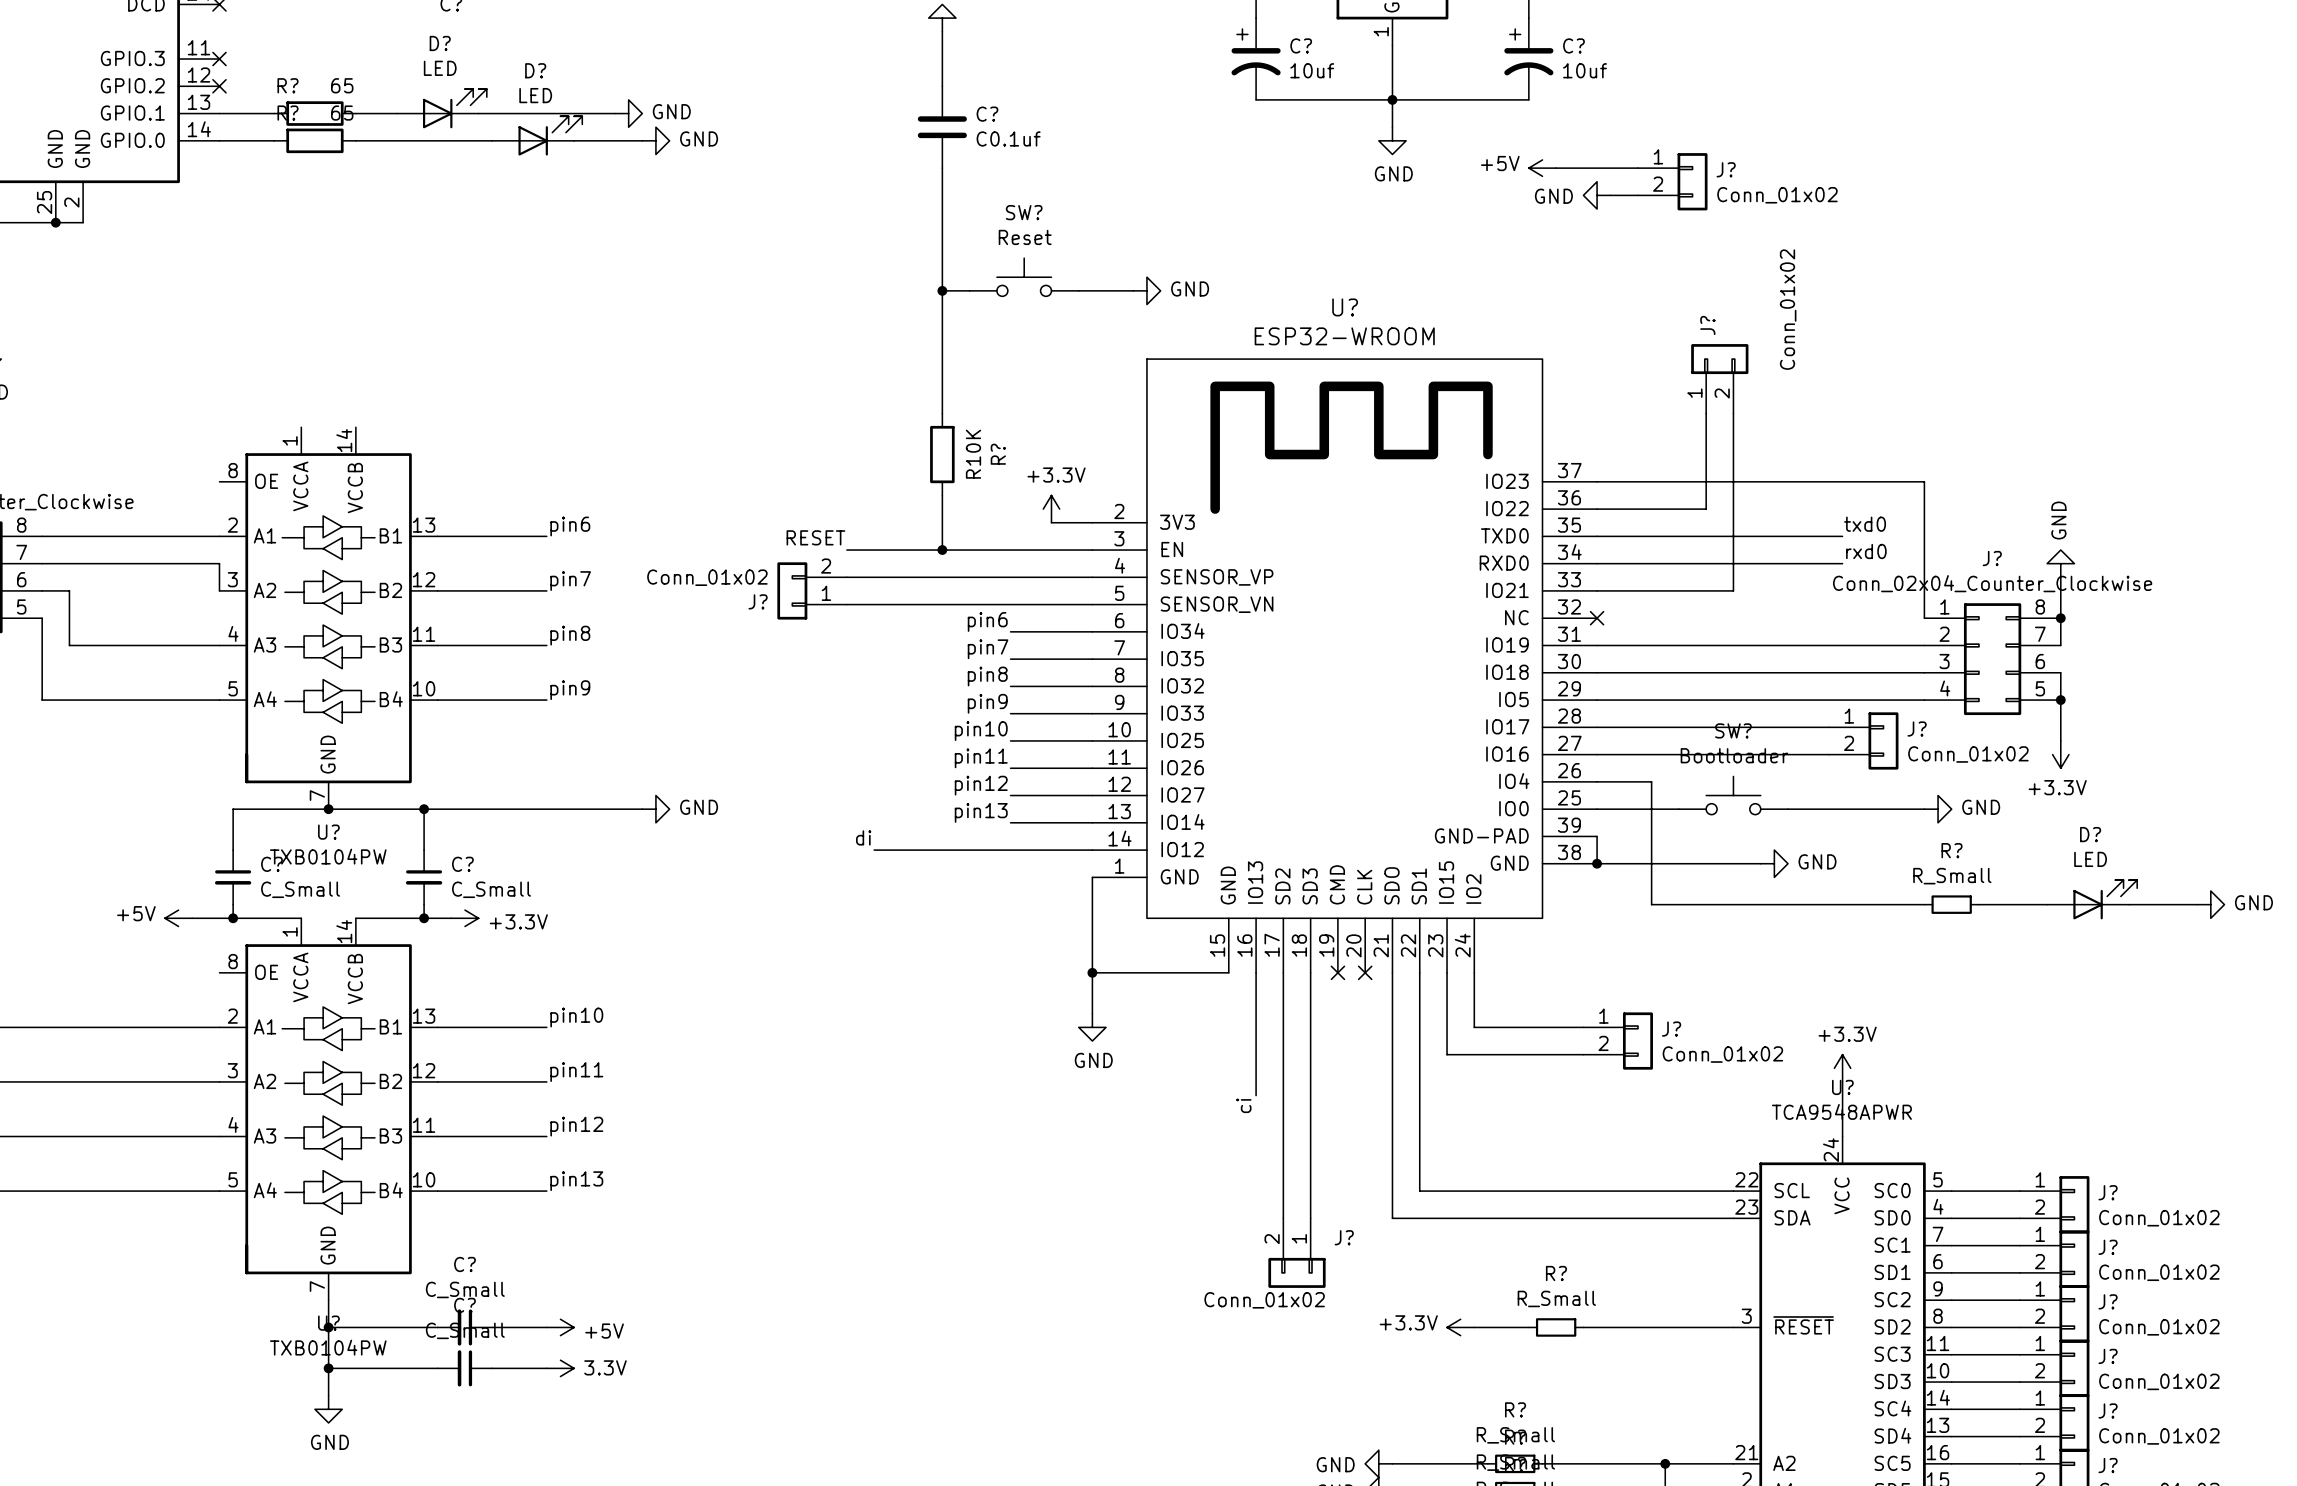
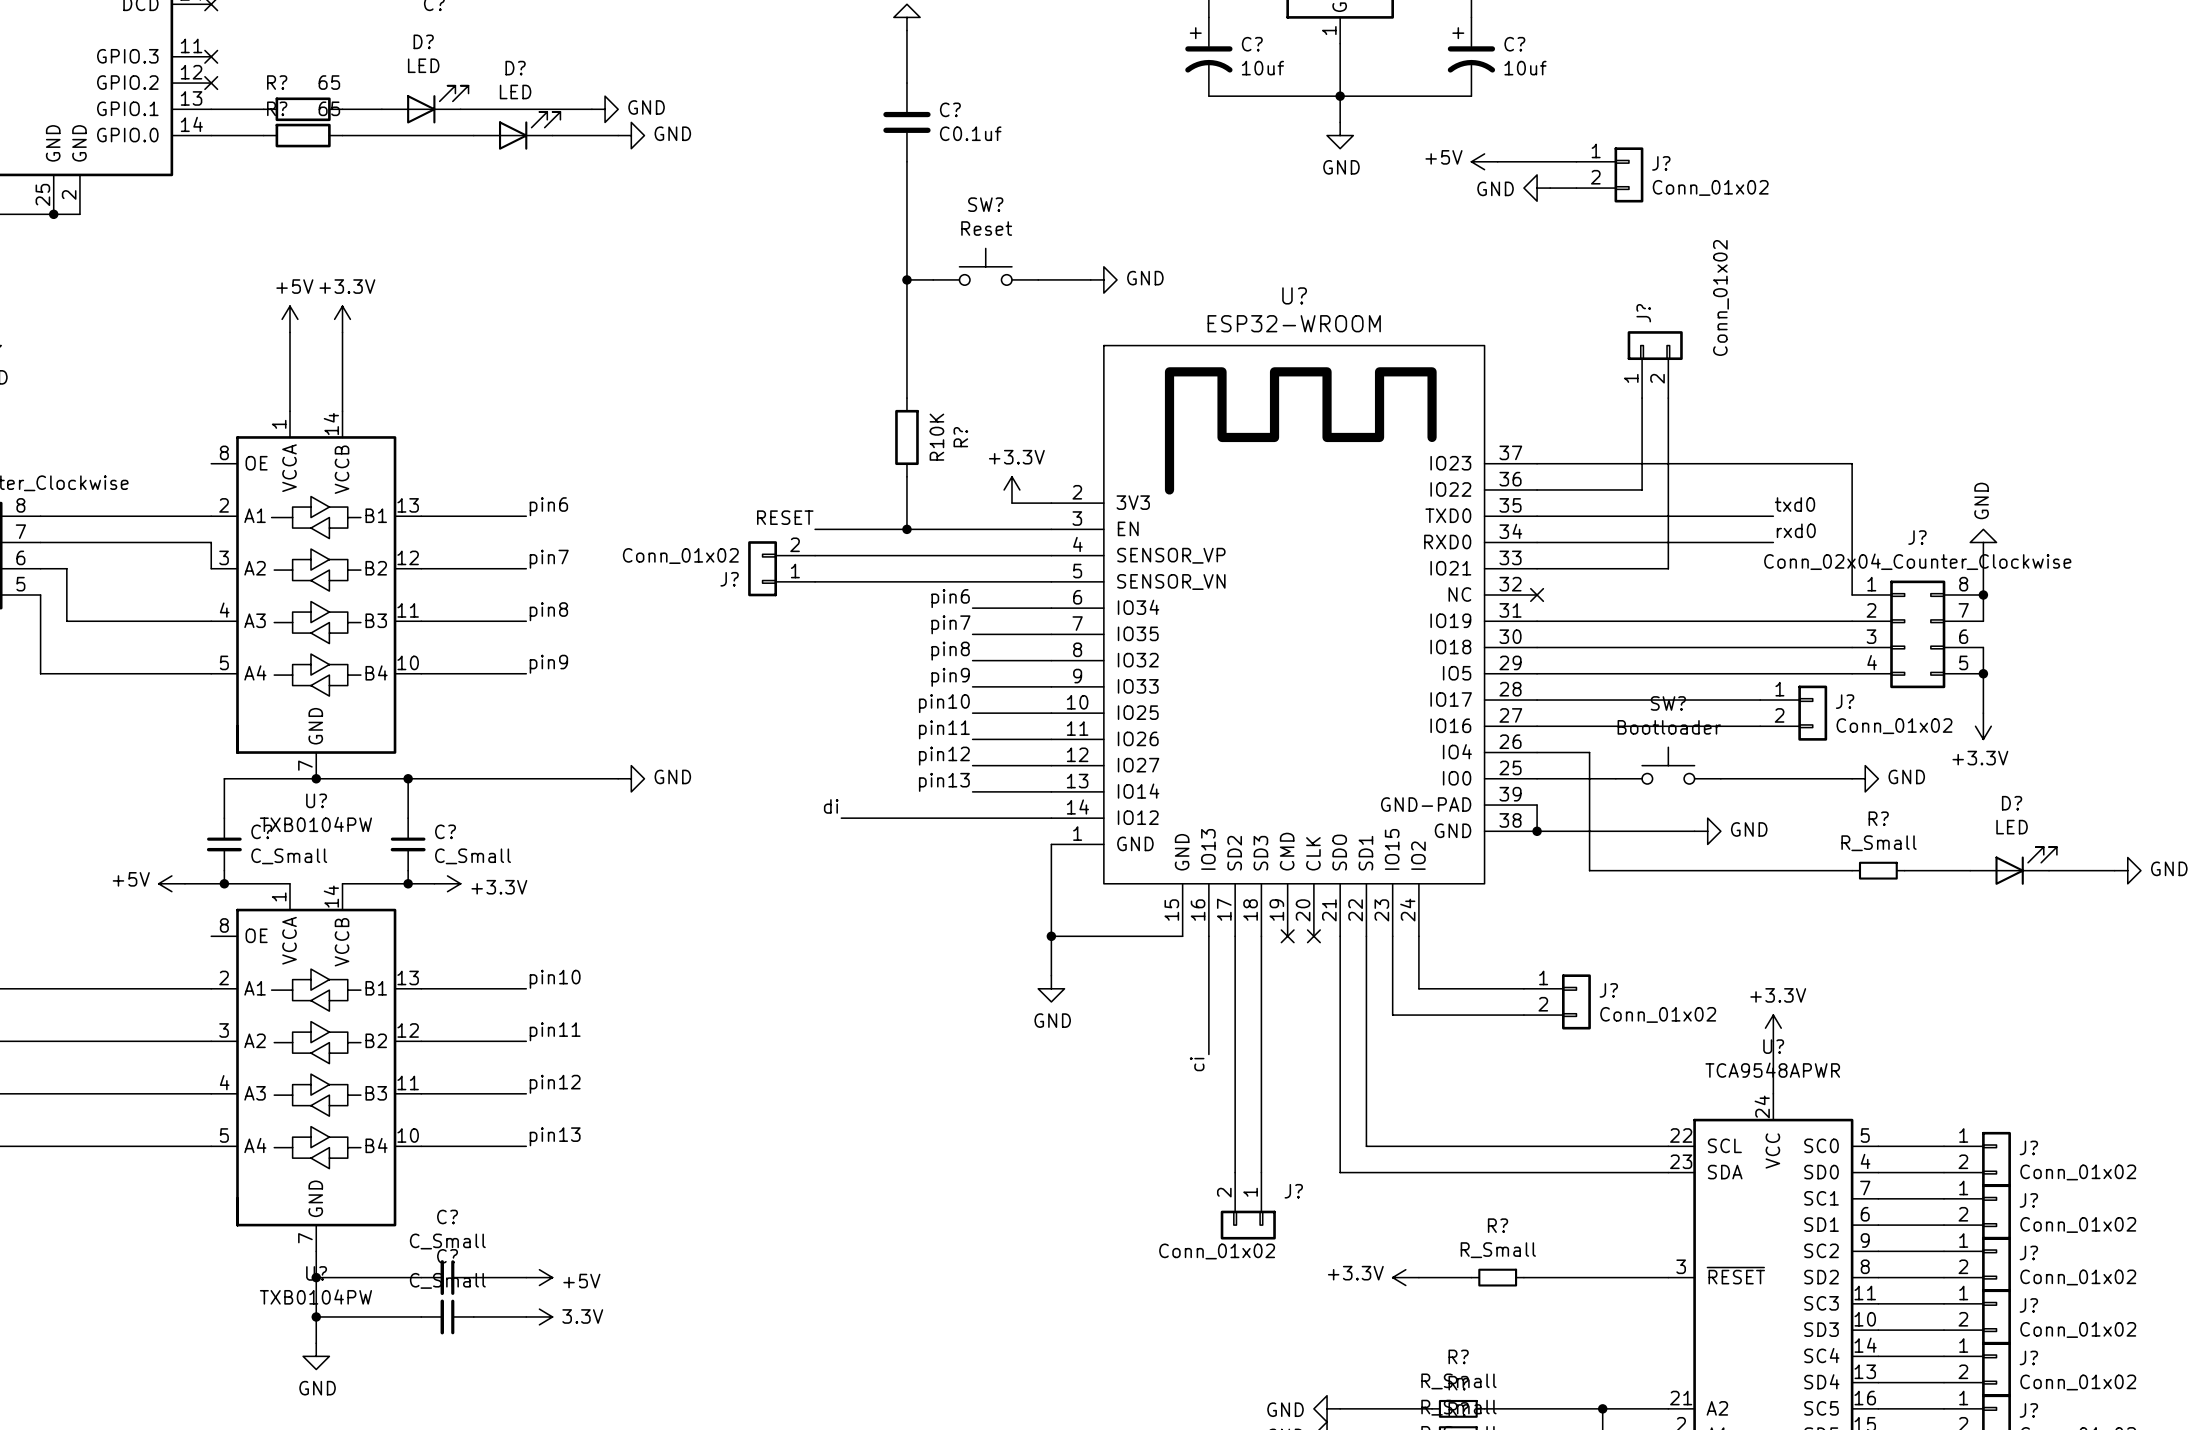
power symbol: none -> +5V (290, 319)
power symbol: none -> +3.3V (342, 319)
wire: none -> (290, 332) (290, 411)
wire: none -> (342, 332) (342, 411)

